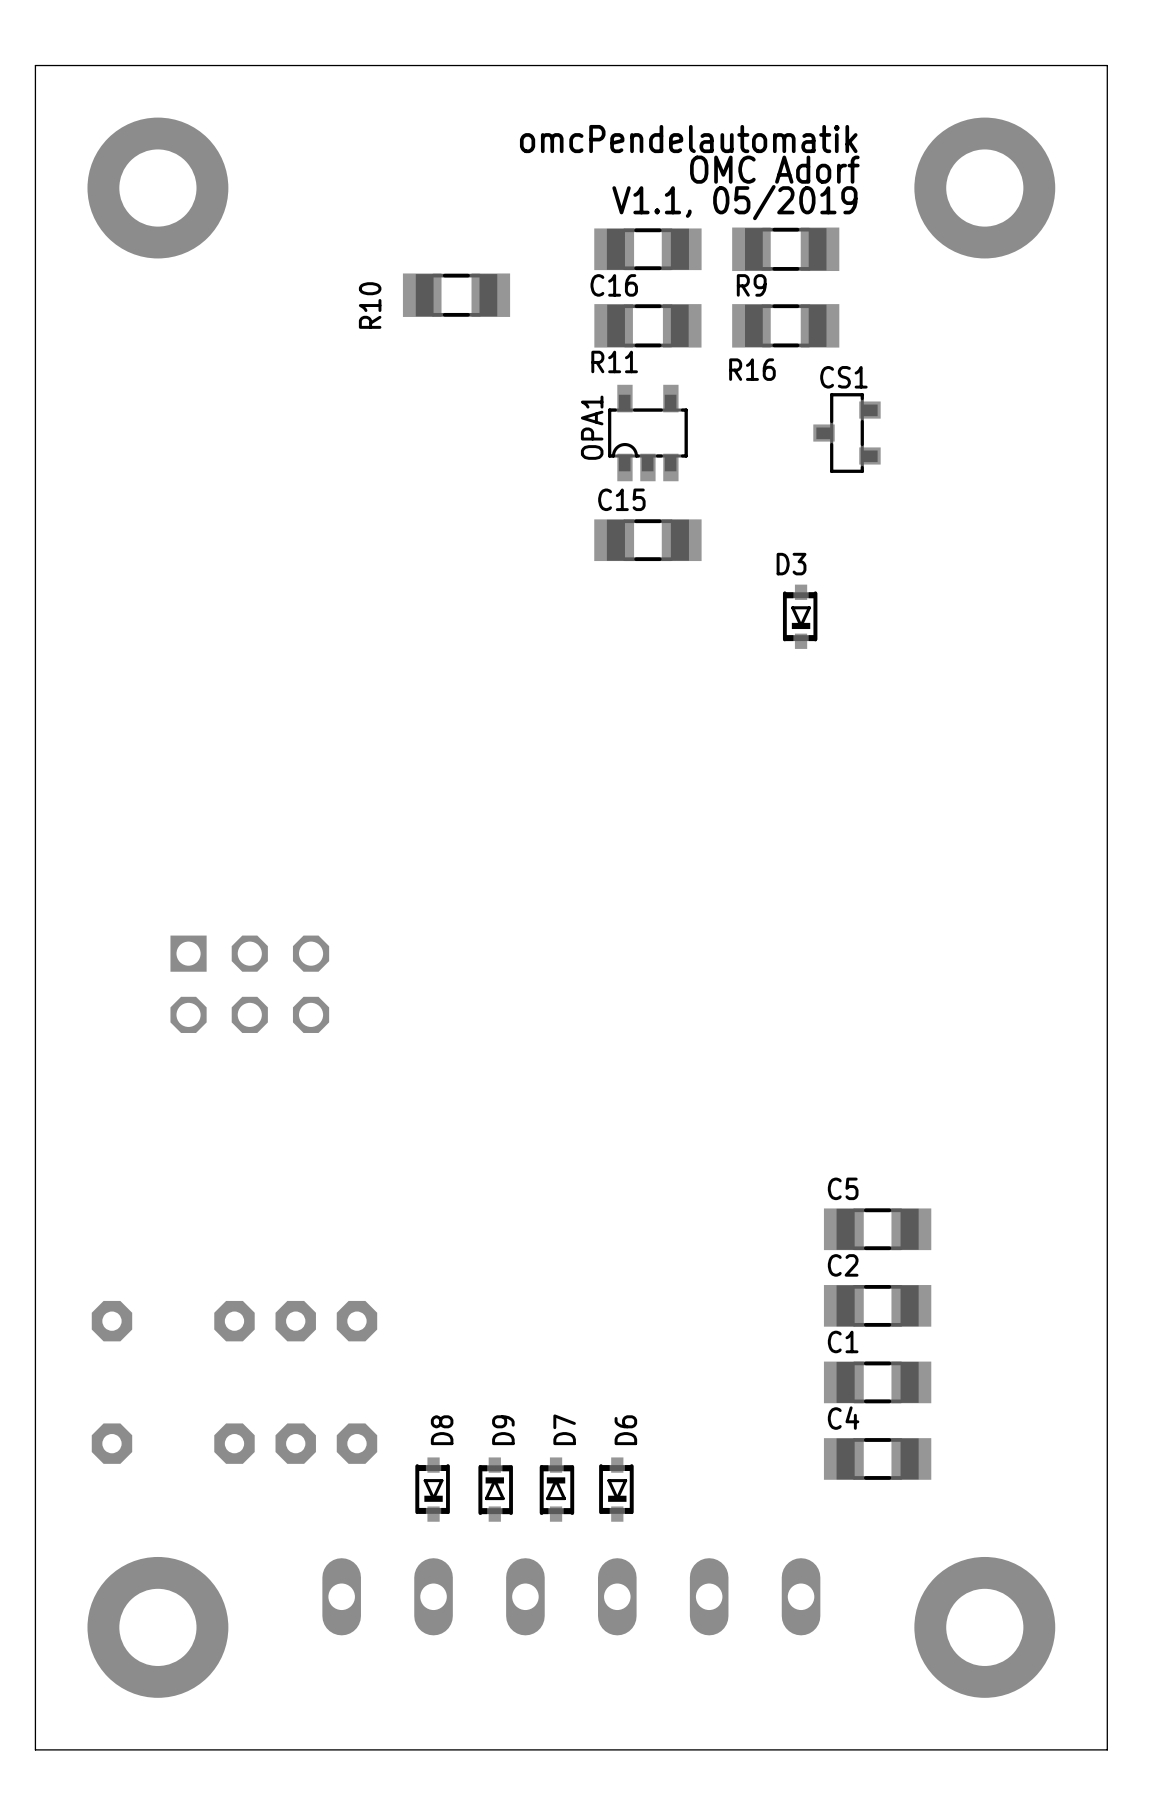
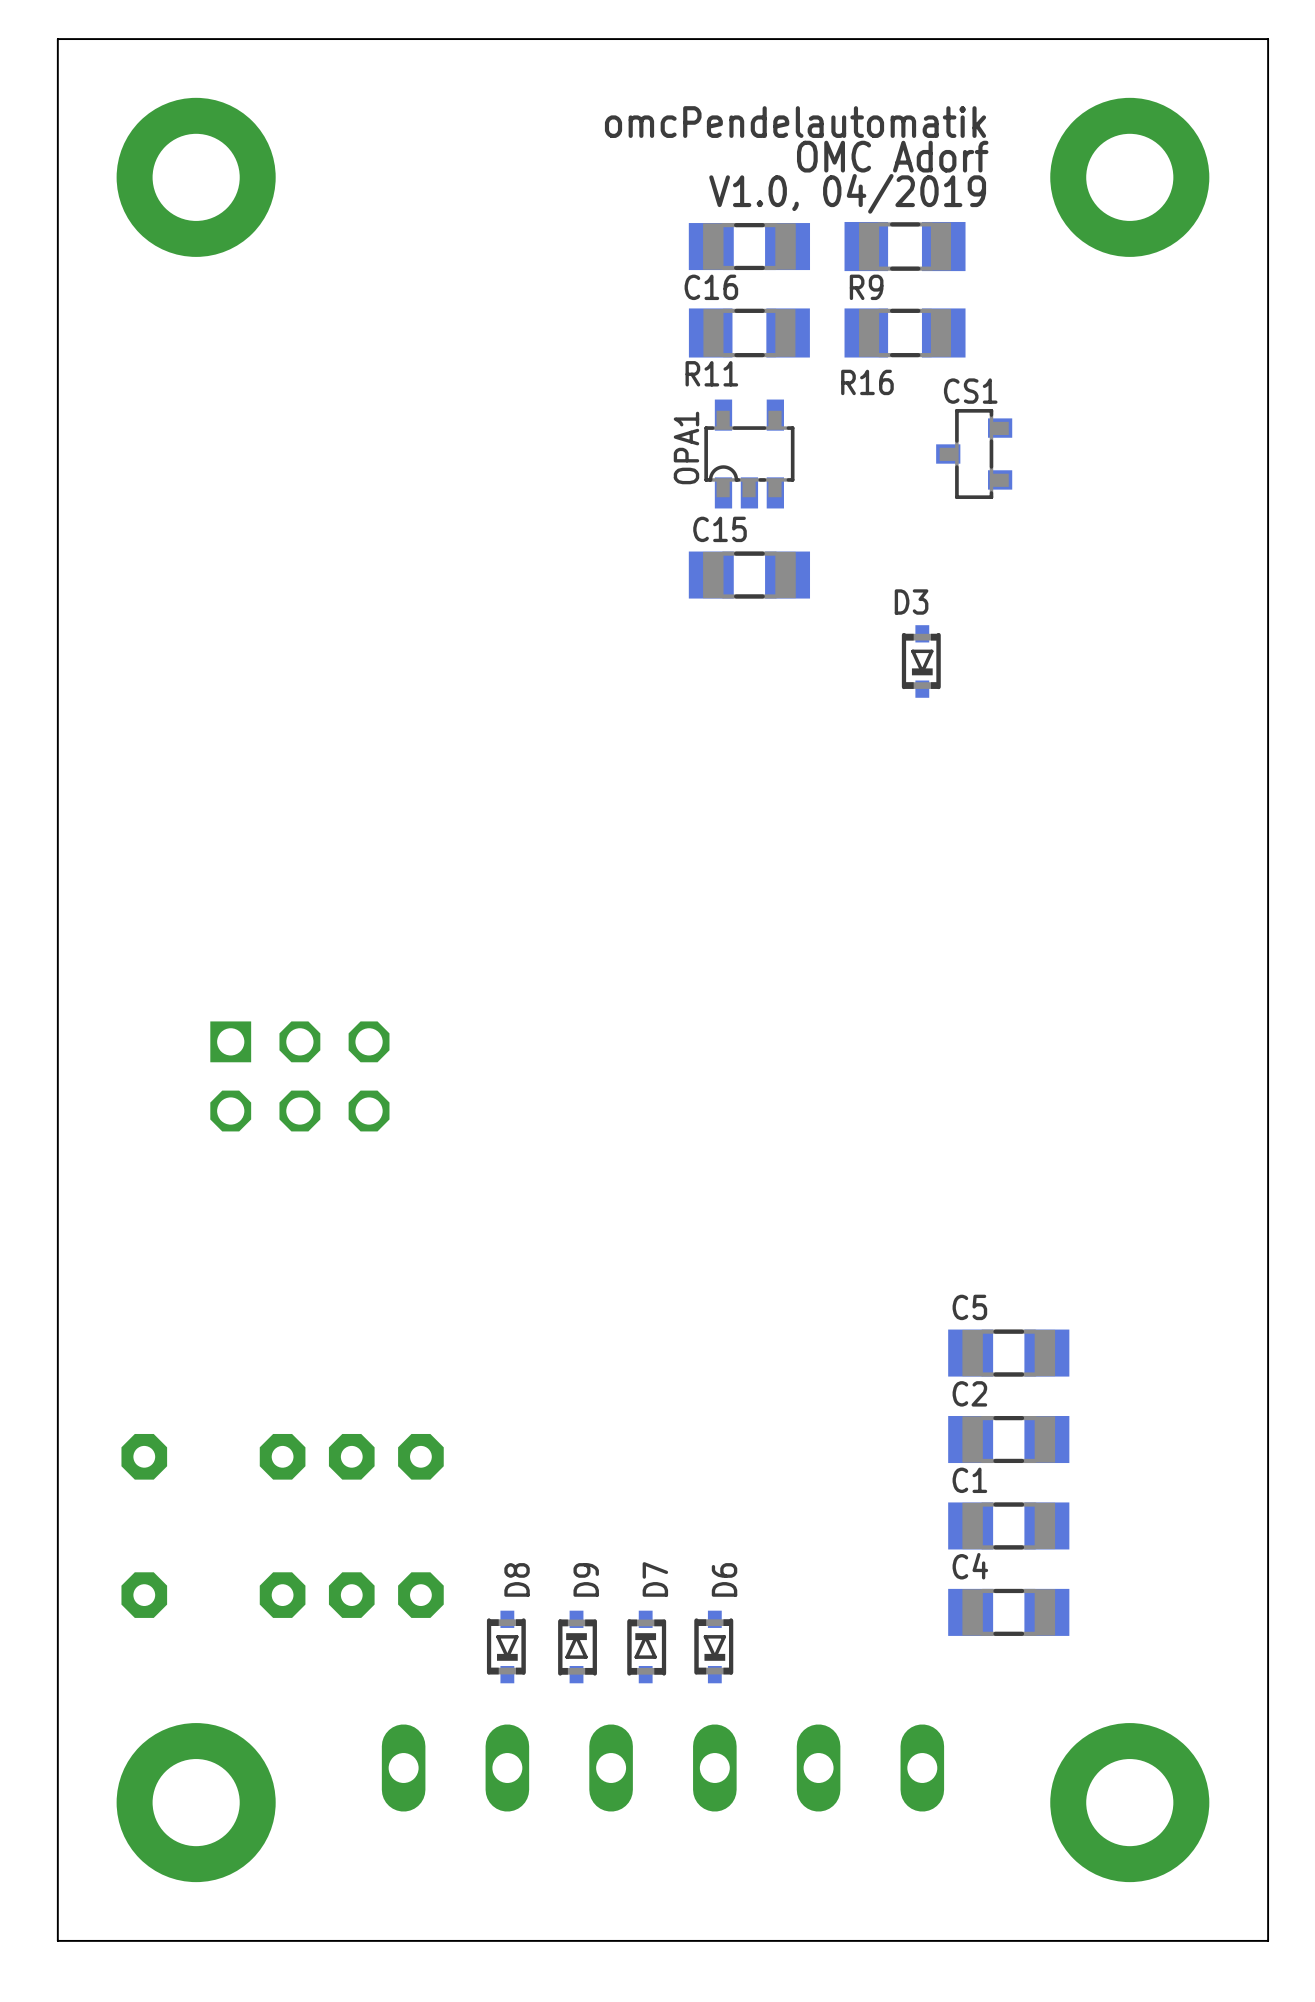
text: V1.1, 05/2019 (734, 202) -> V1.0, 04/2019 (847, 193)
R10: (456, 295) -> none

